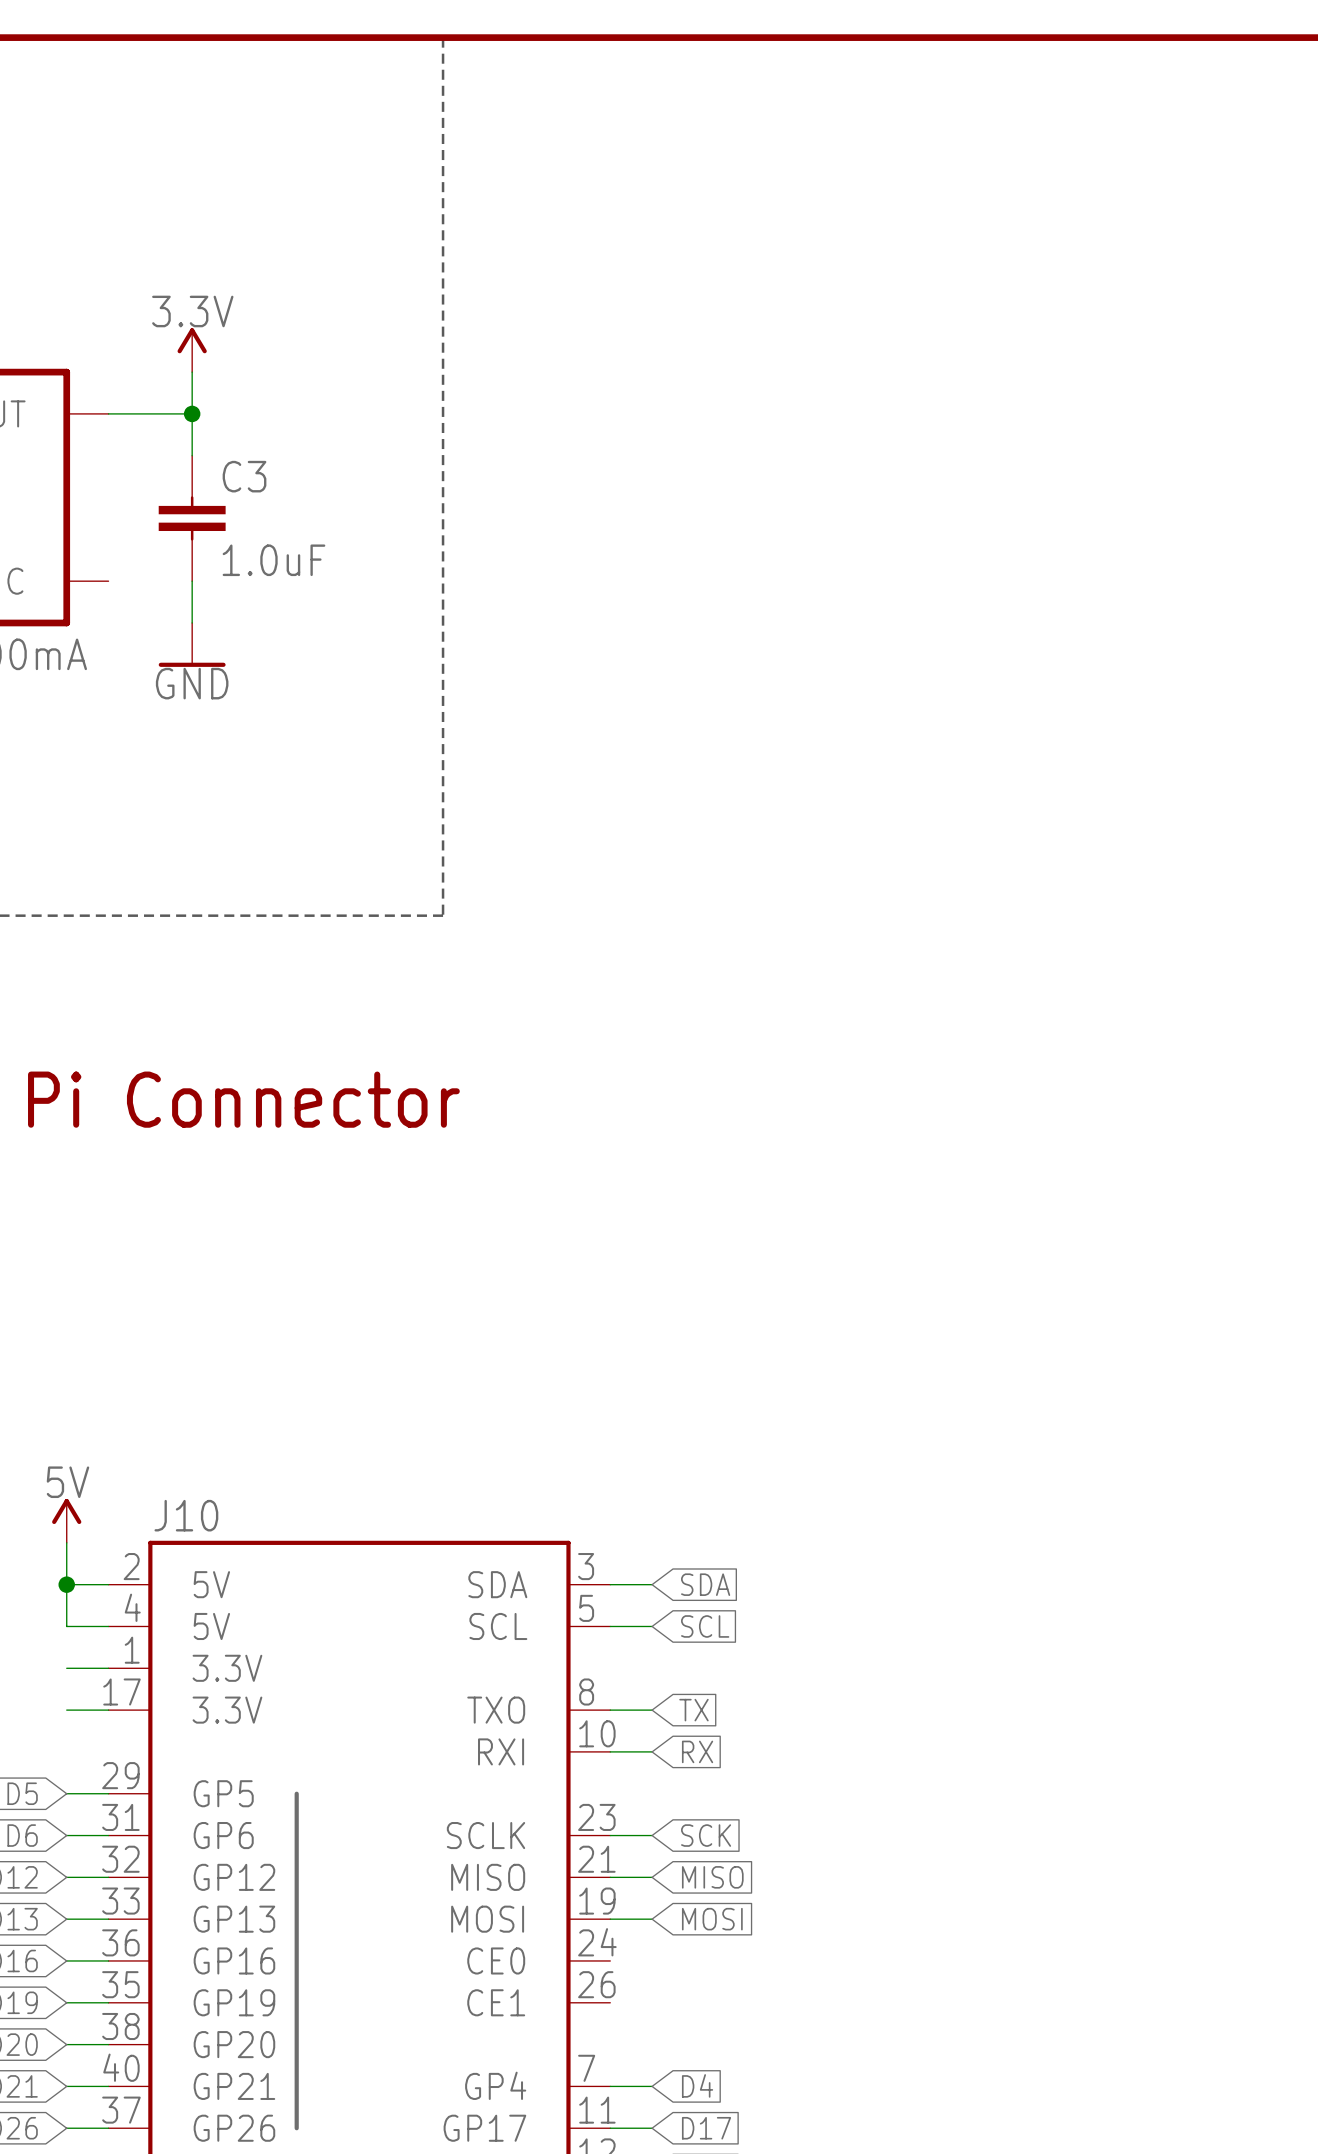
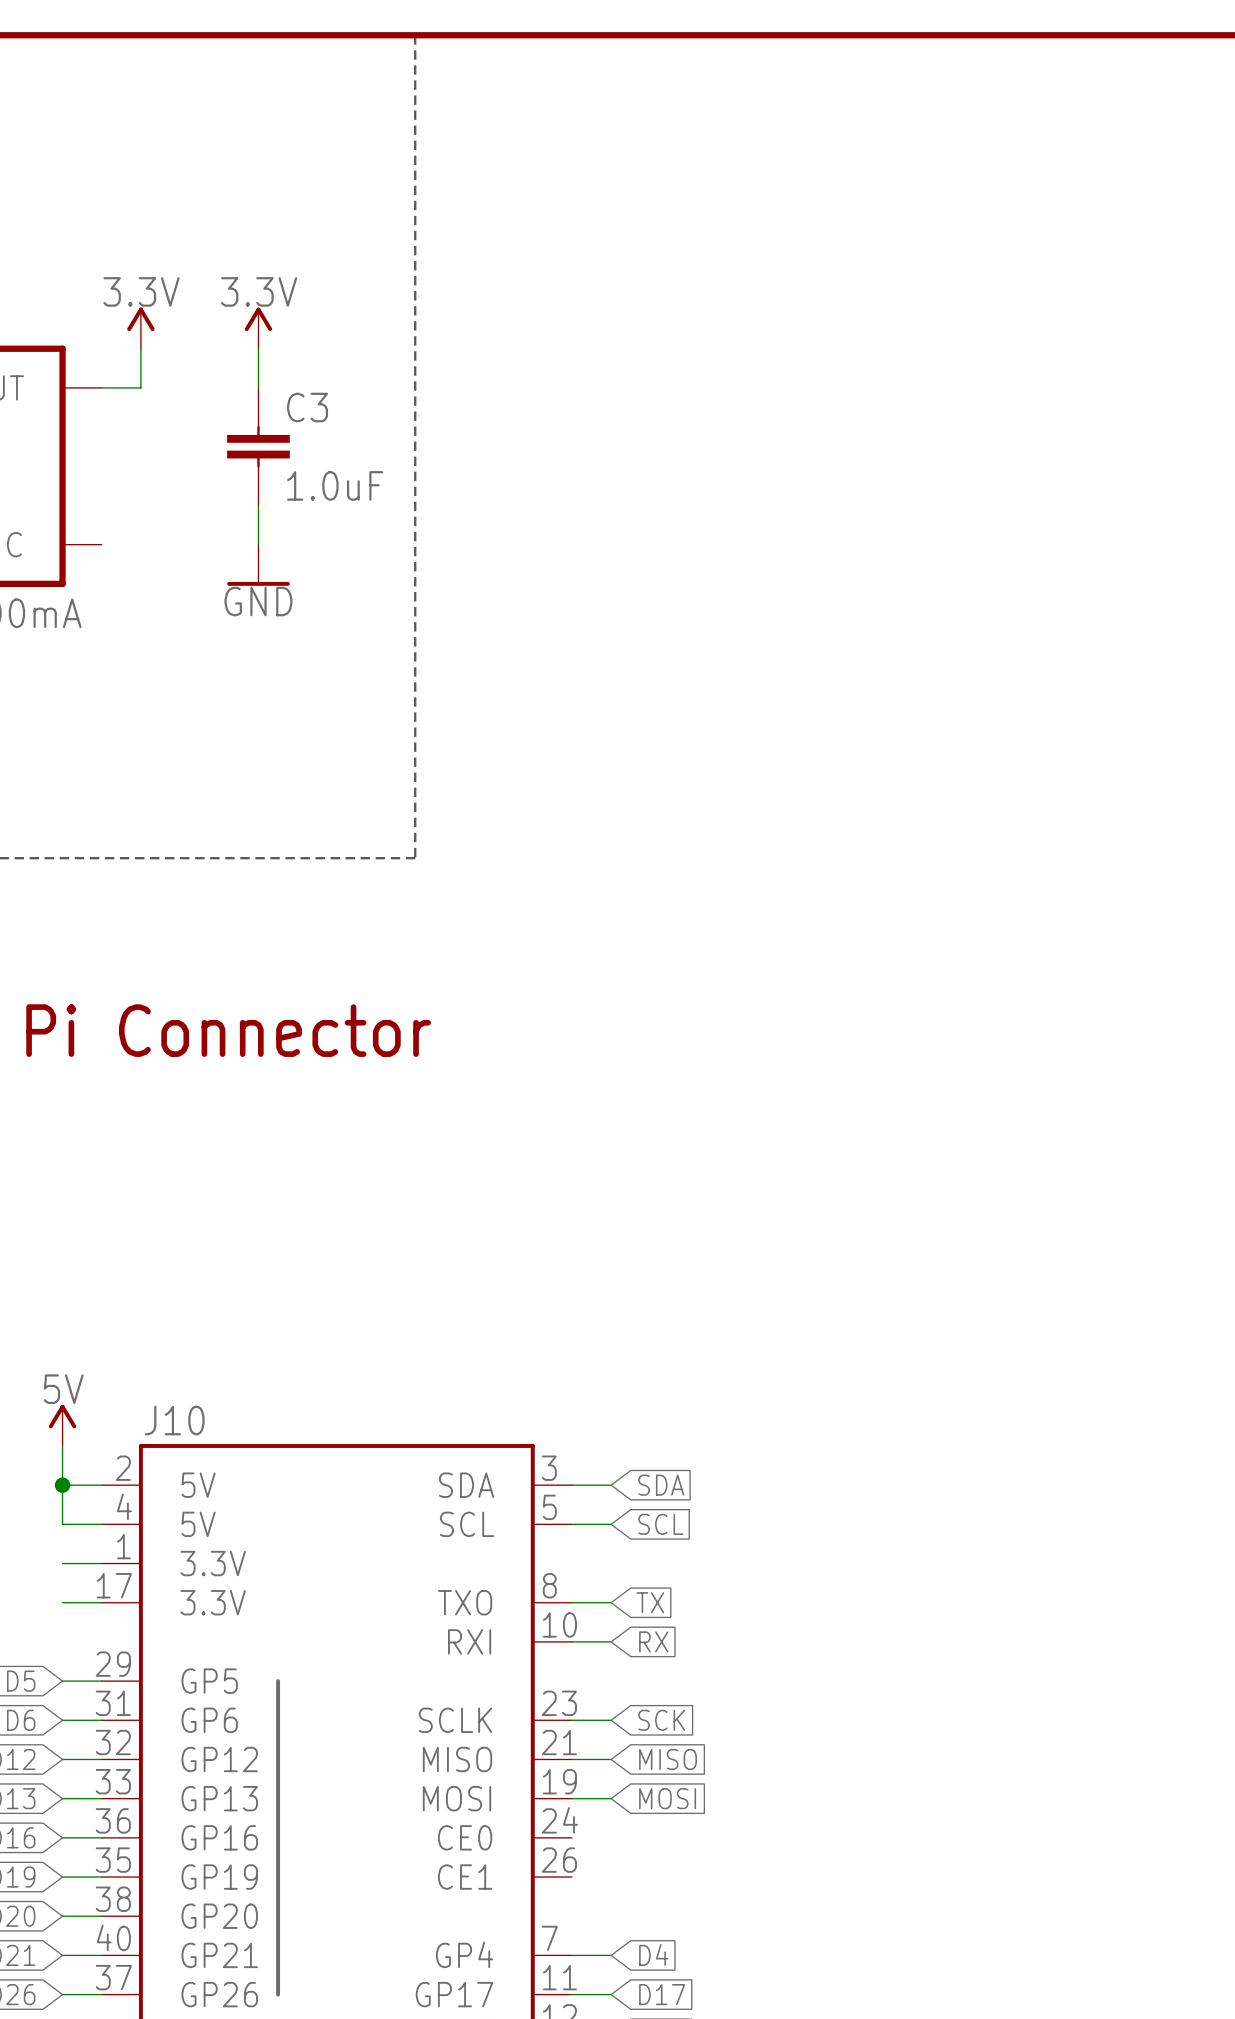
power symbol: none -> 3.3V (140, 328)
power symbol: 3.3V (192, 350) -> none
power symbol: none -> 3.3V (258, 328)
wire: (192, 372) (192, 455) -> none
wire: none -> (258, 348) (258, 387)
wire: (150, 413) (192, 413) -> (140, 387) (140, 348)
junction: (192, 413) -> none
C3 position: (192, 518) -> (258, 446)
wire: (192, 581) (192, 622) -> (258, 505) (258, 544)
power symbol position: GND (192, 644) -> GND (258, 565)

